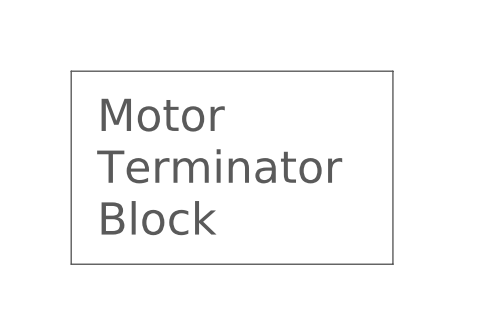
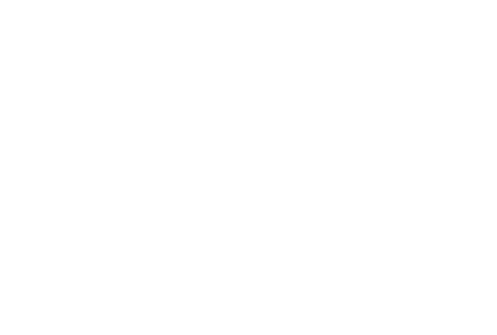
line: (71, 71) (392, 71) (392, 264) (71, 264) (71, 71) -> none
text: Motor (163, 115) -> none
text: Terminator (219, 166) -> none
text: Block (159, 218) -> none

